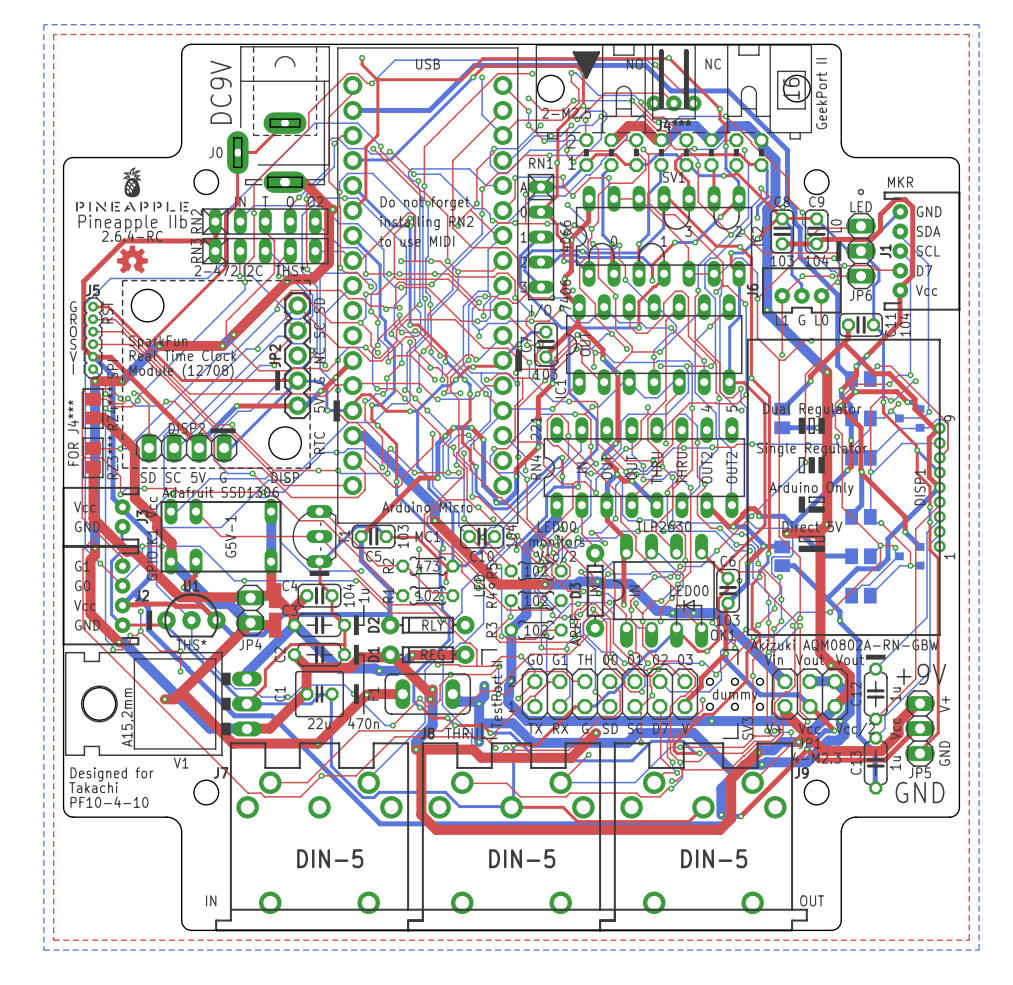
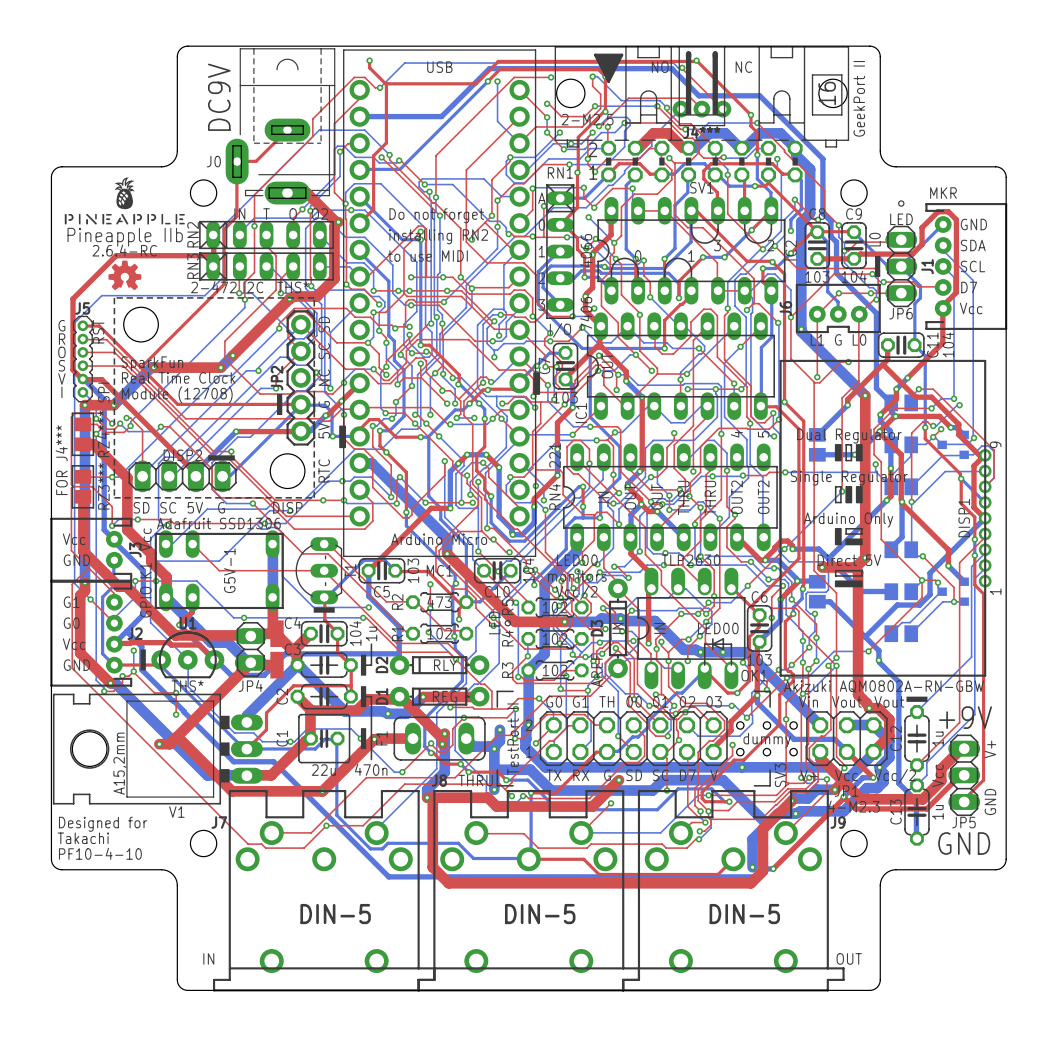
bottom zone outline: (43, 24) (979, 24) (979, 950) (43, 950) (43, 24) -> none
top zone outline: (53, 34) (969, 34) (969, 940) (53, 940) (53, 34) -> none

